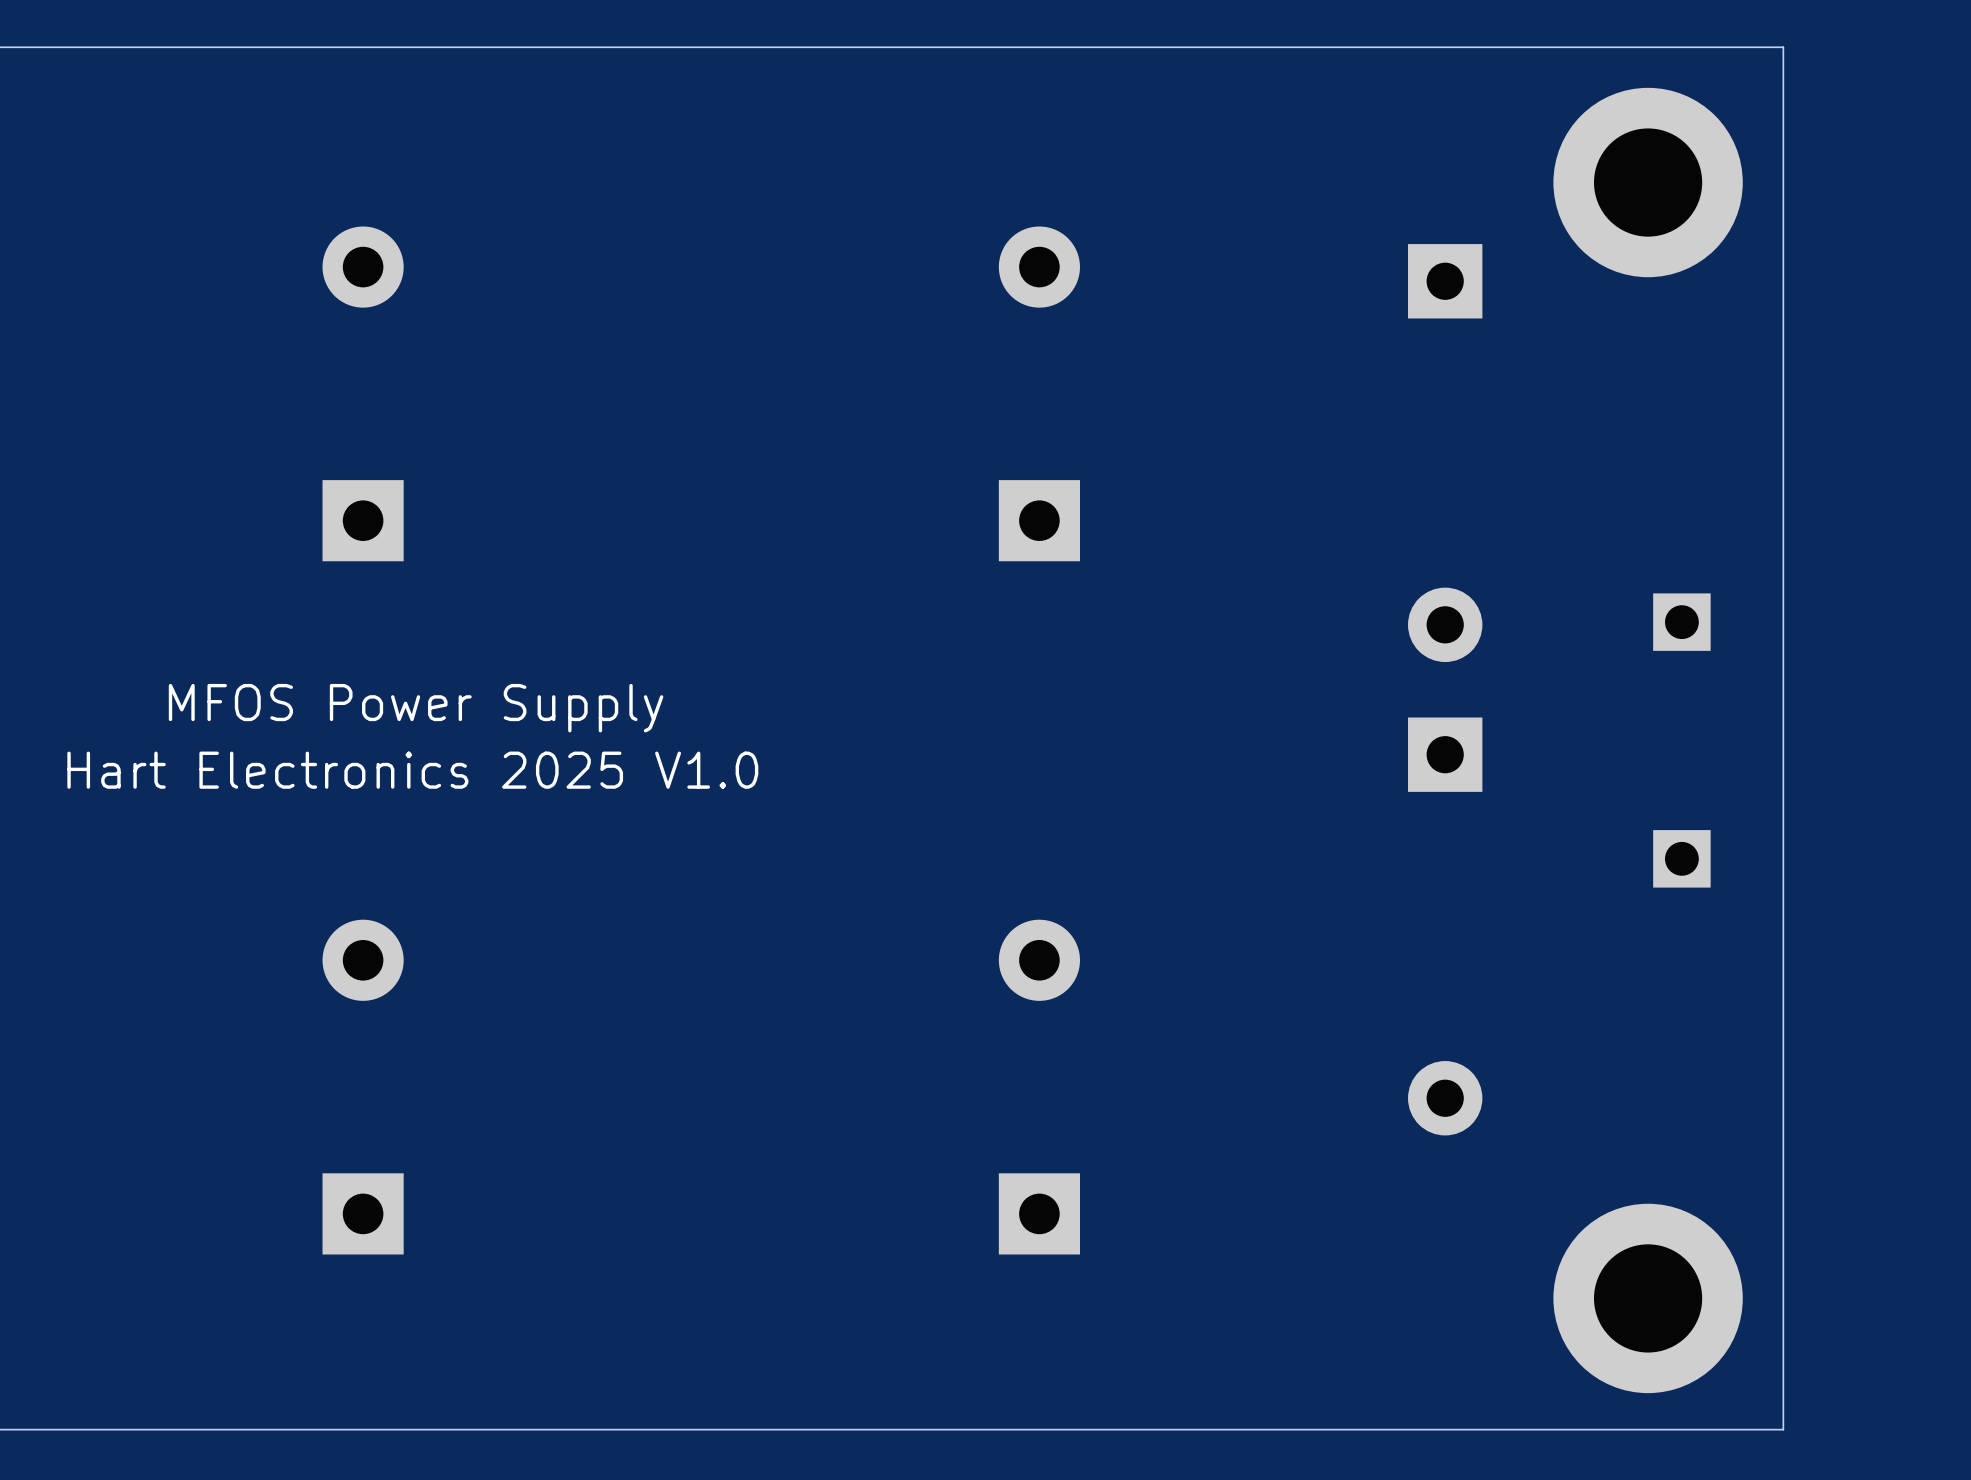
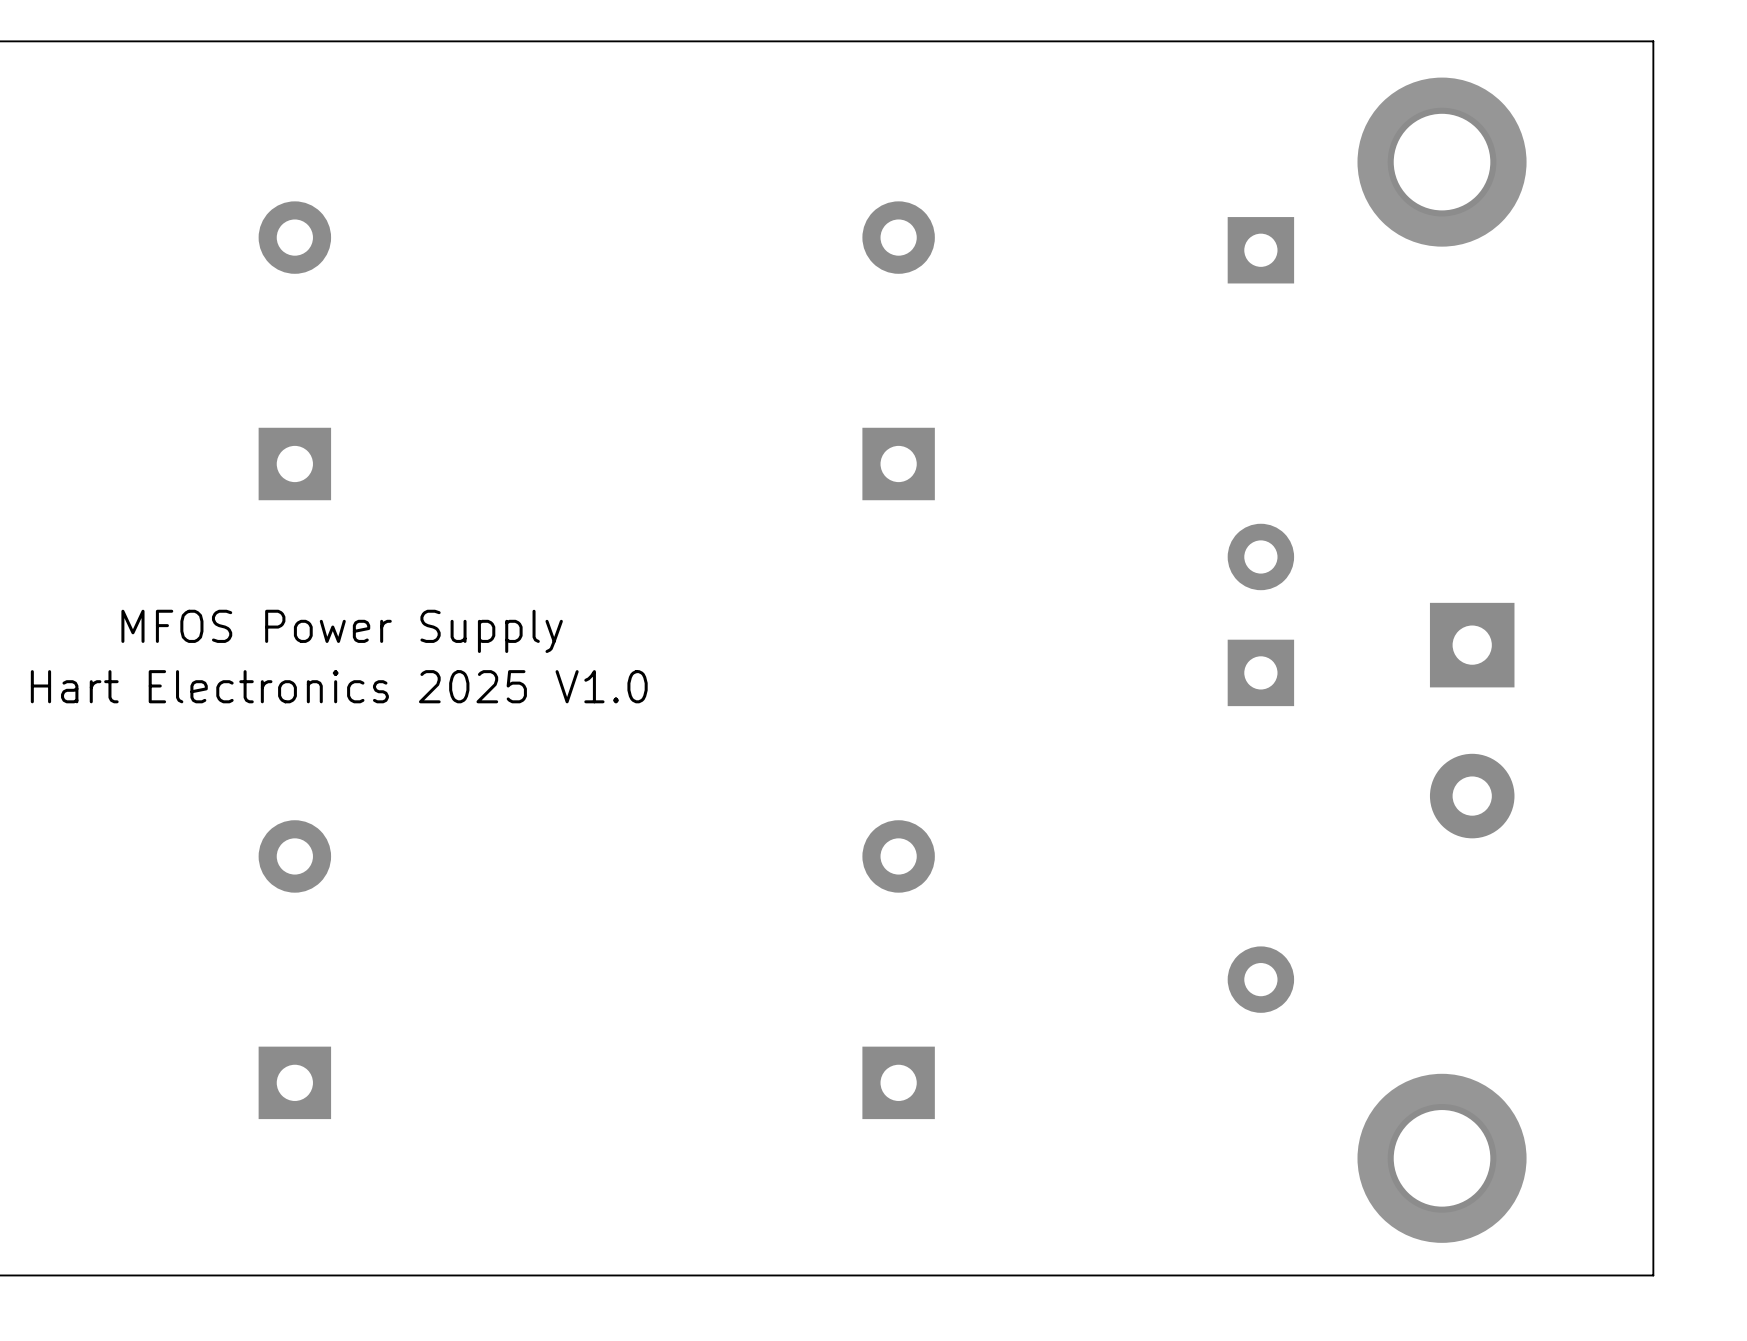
board edge: (1783, 47) (1783, 1429) -> (1562, 41) (1653, 41) (1653, 1275) (1562, 1275)
part: (1681, 622) -> none
part: none -> (1472, 720)
part: (1681, 858) -> none

